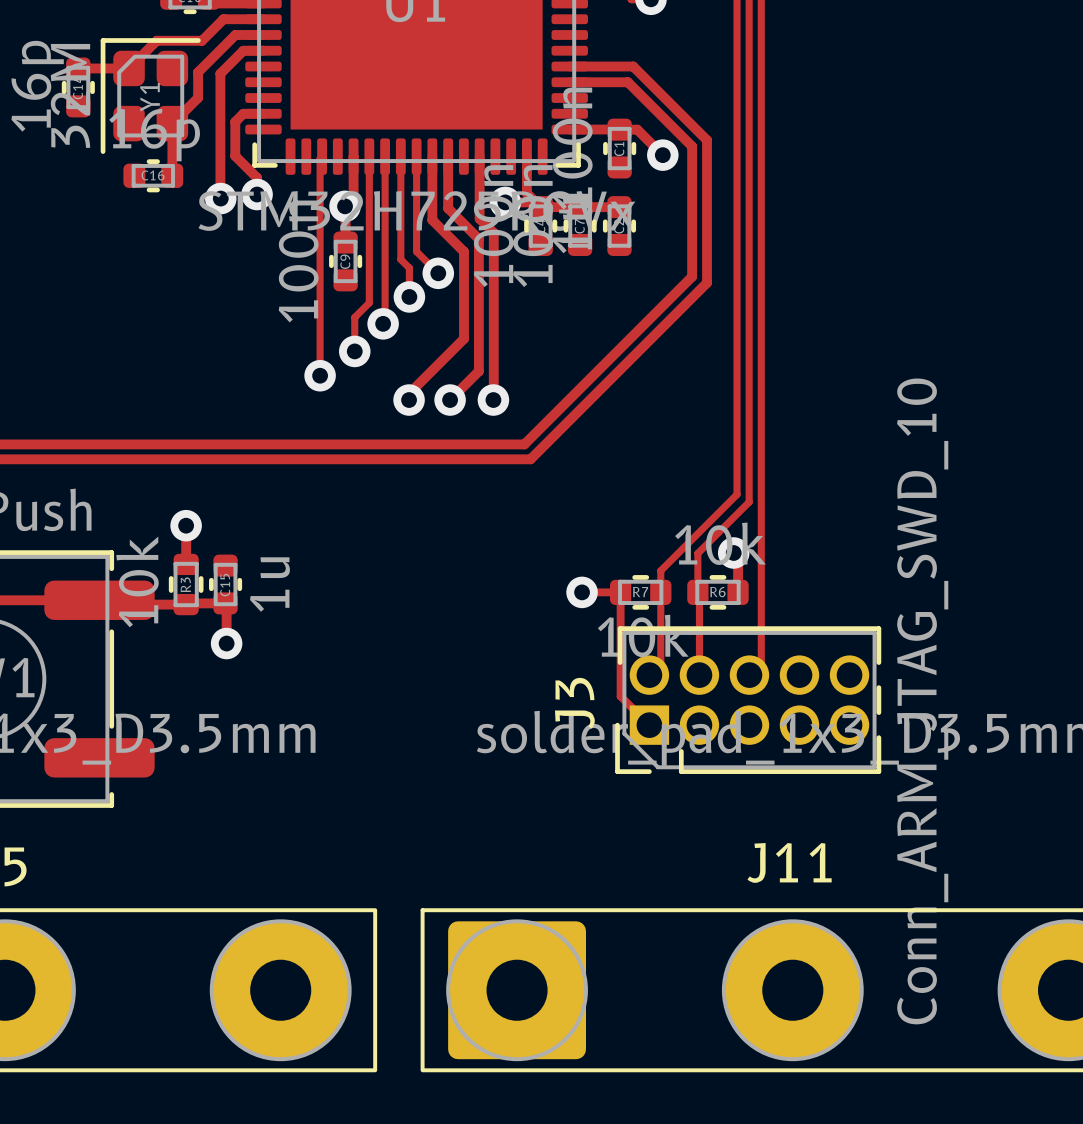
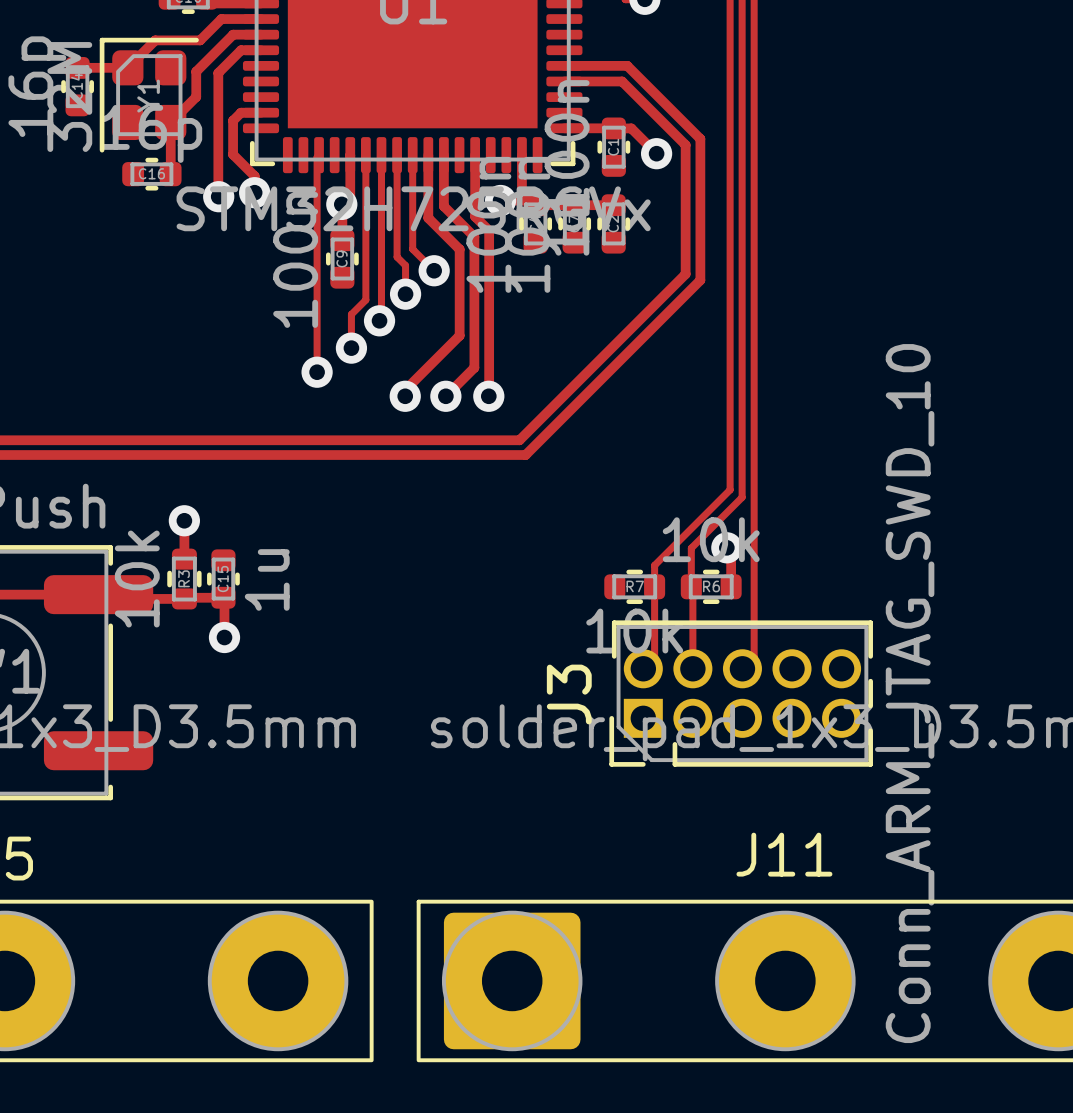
track: (582, 592) (620, 592) (620, 696) (649, 725) -> none
via: (582, 592) -> none

